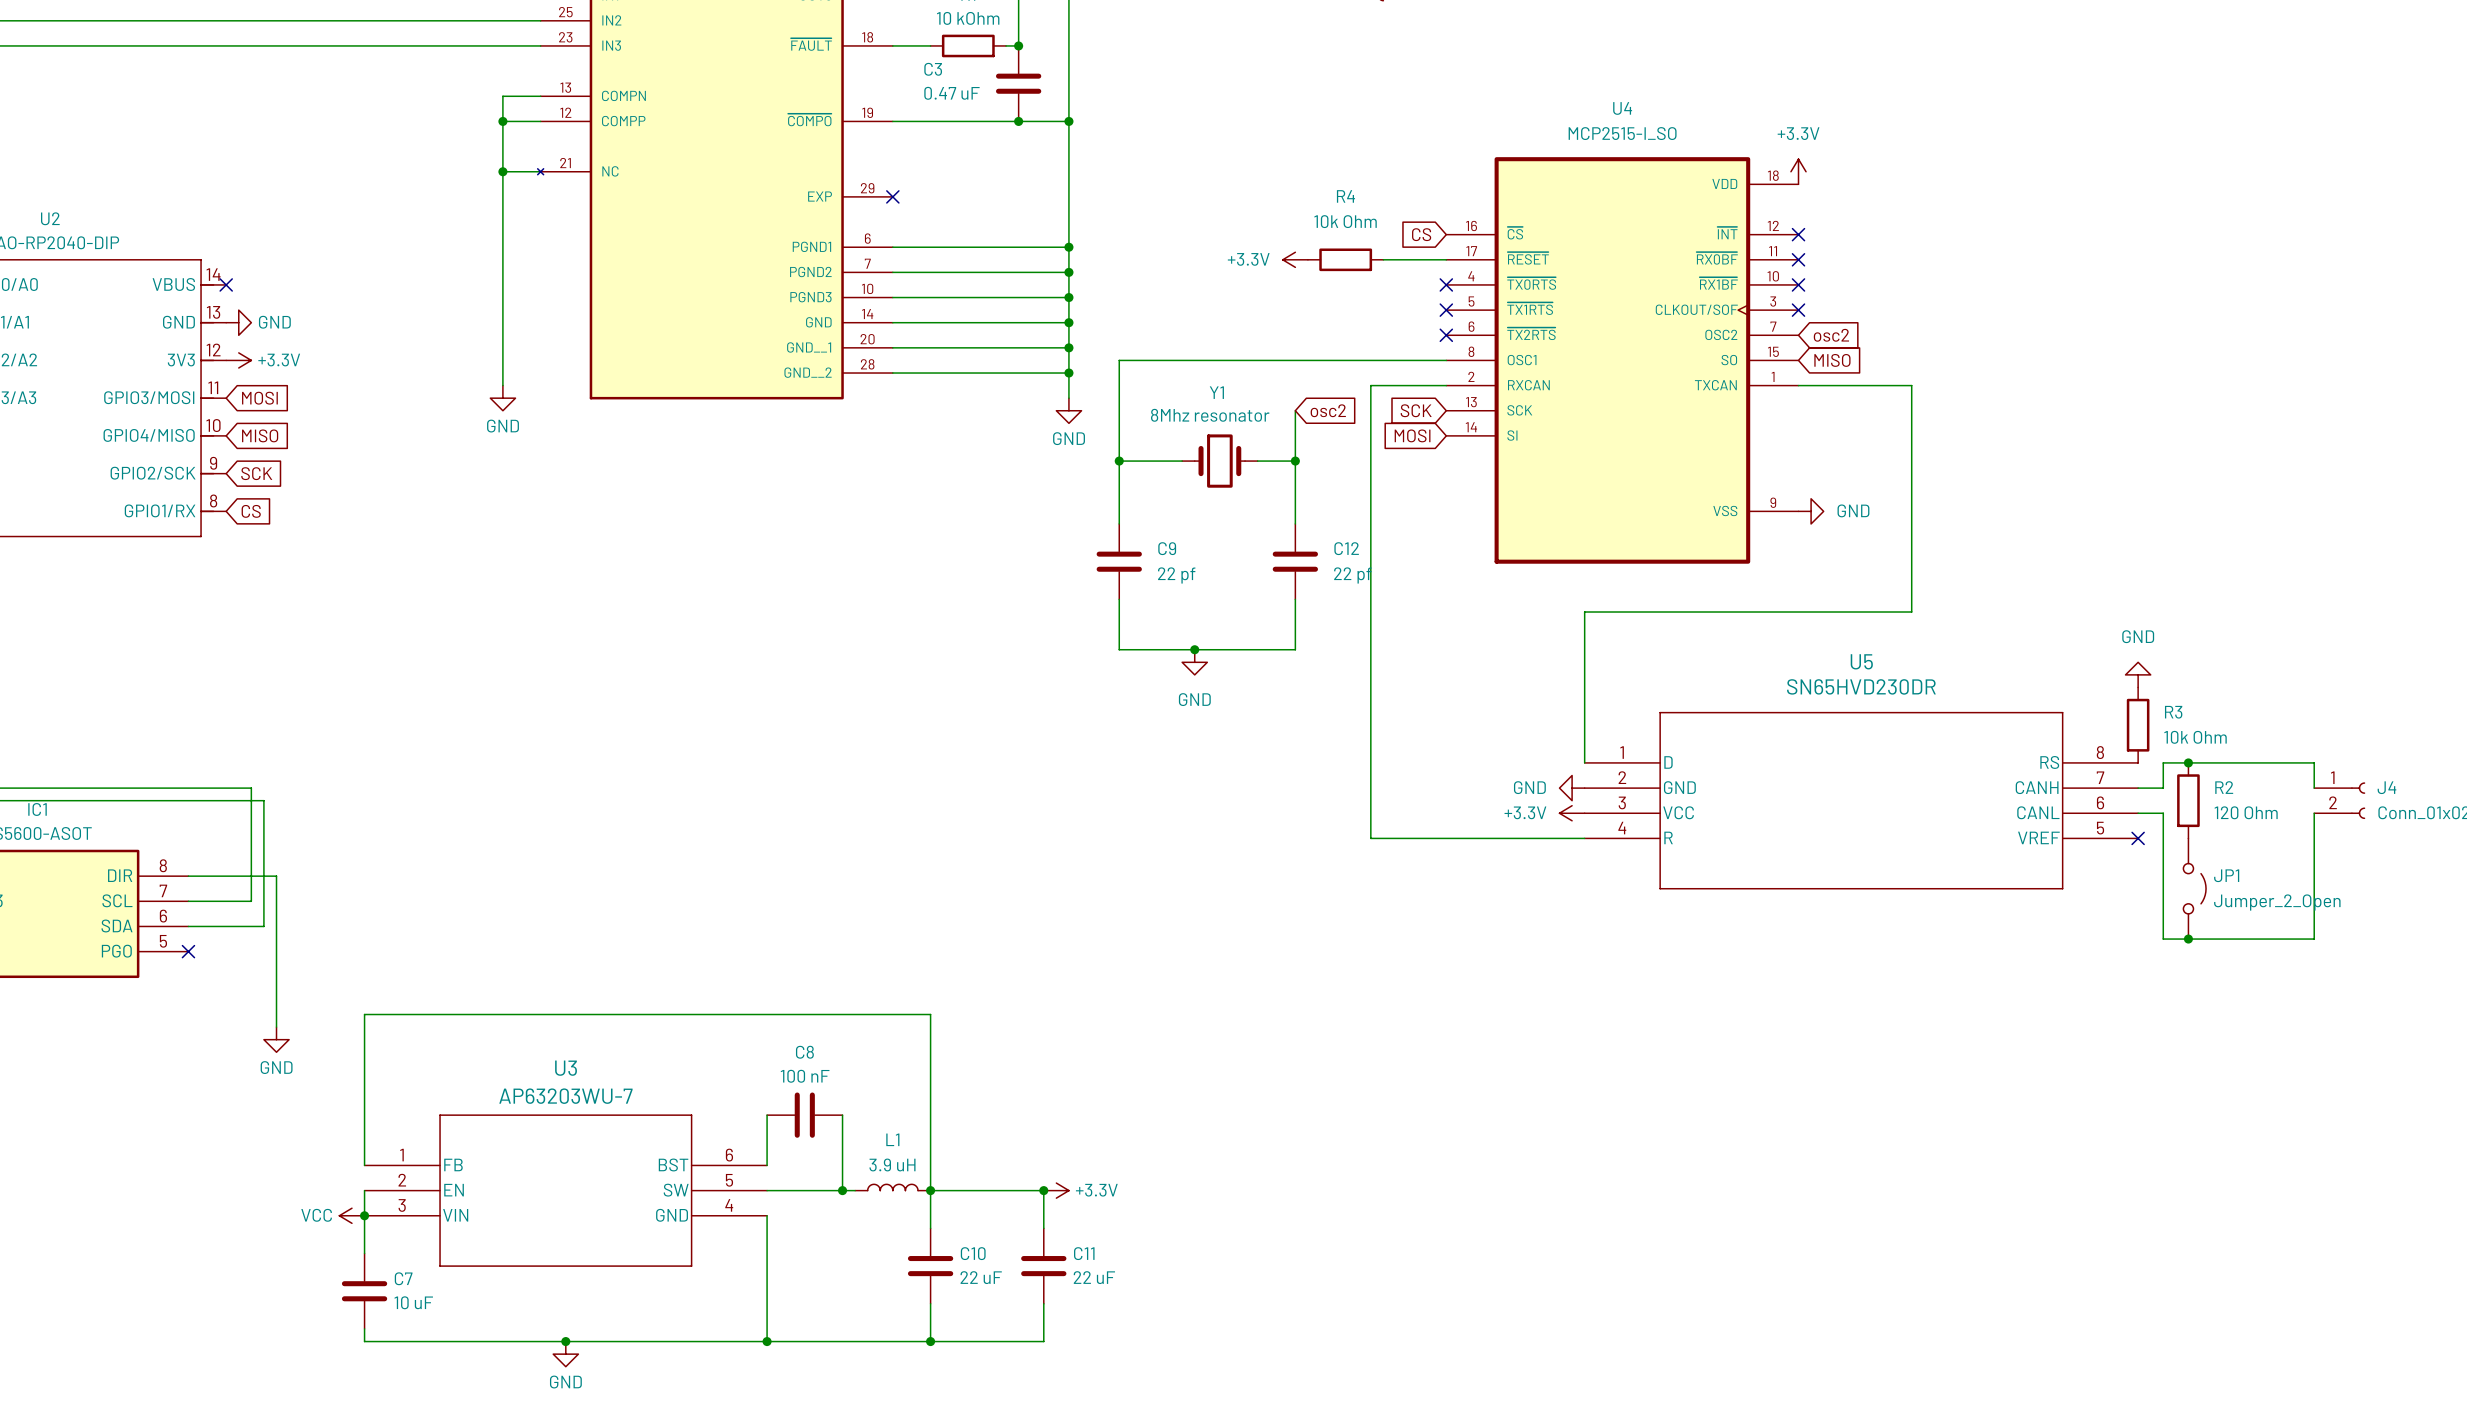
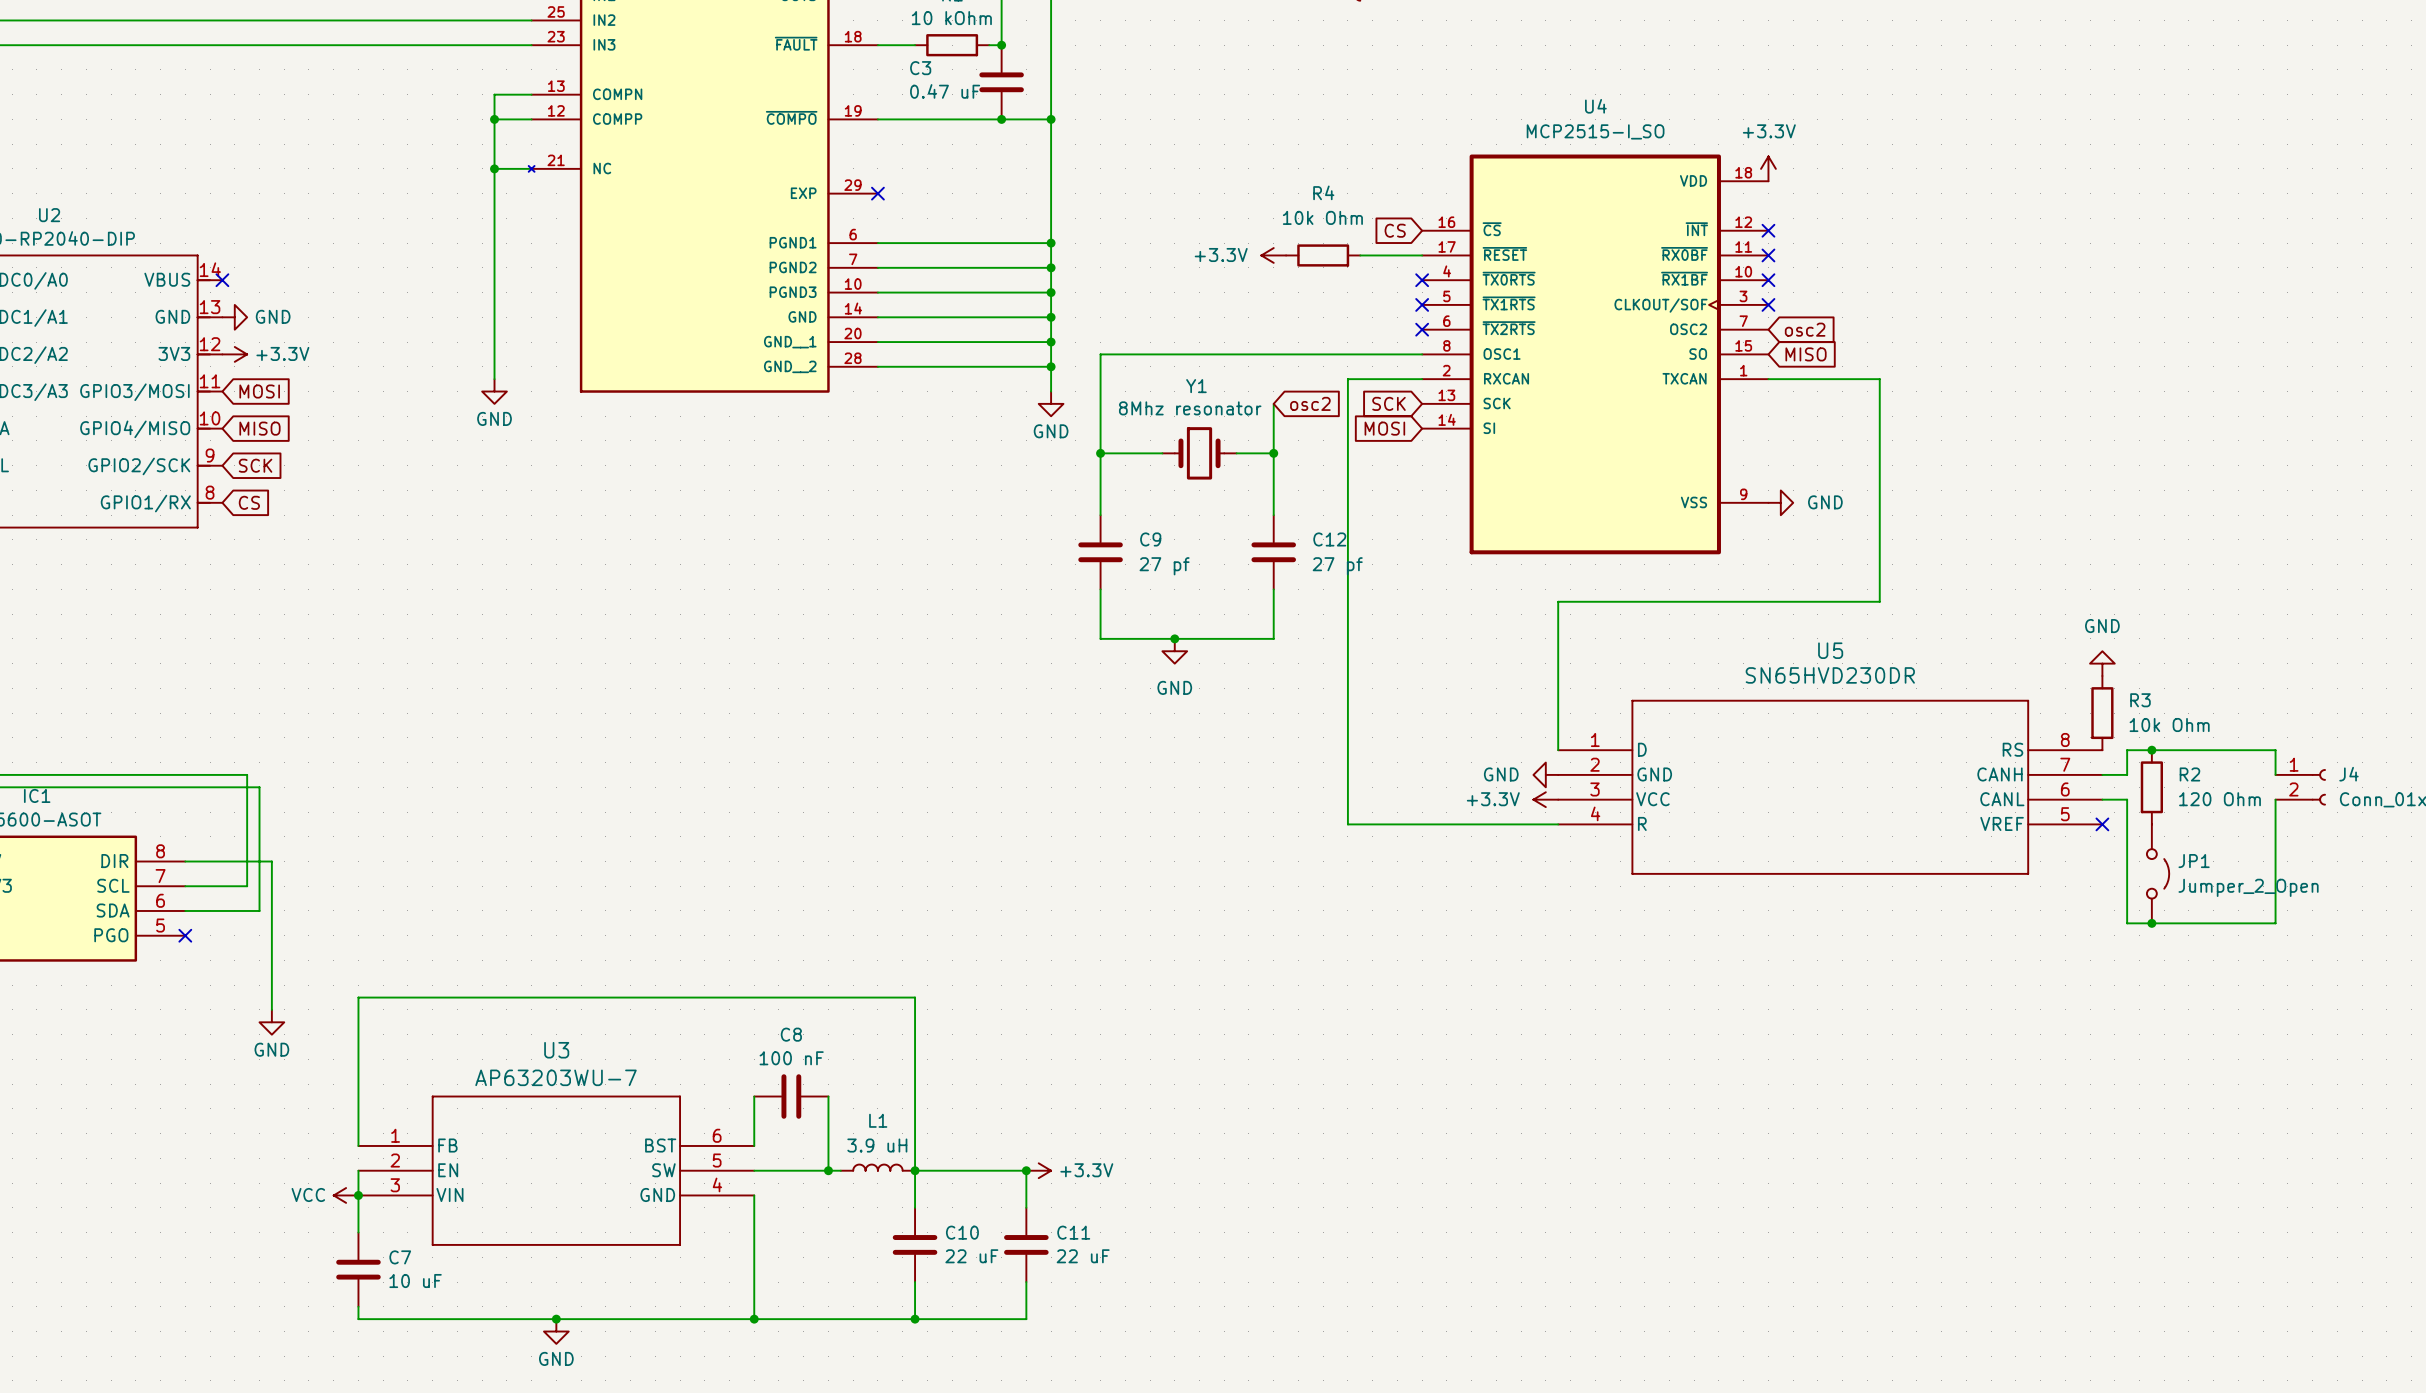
C9 value: 22 pf (1176, 575) -> 27 pf (1164, 566)
C12 value: 22 pf (1352, 575) -> 27 pf (1337, 566)

